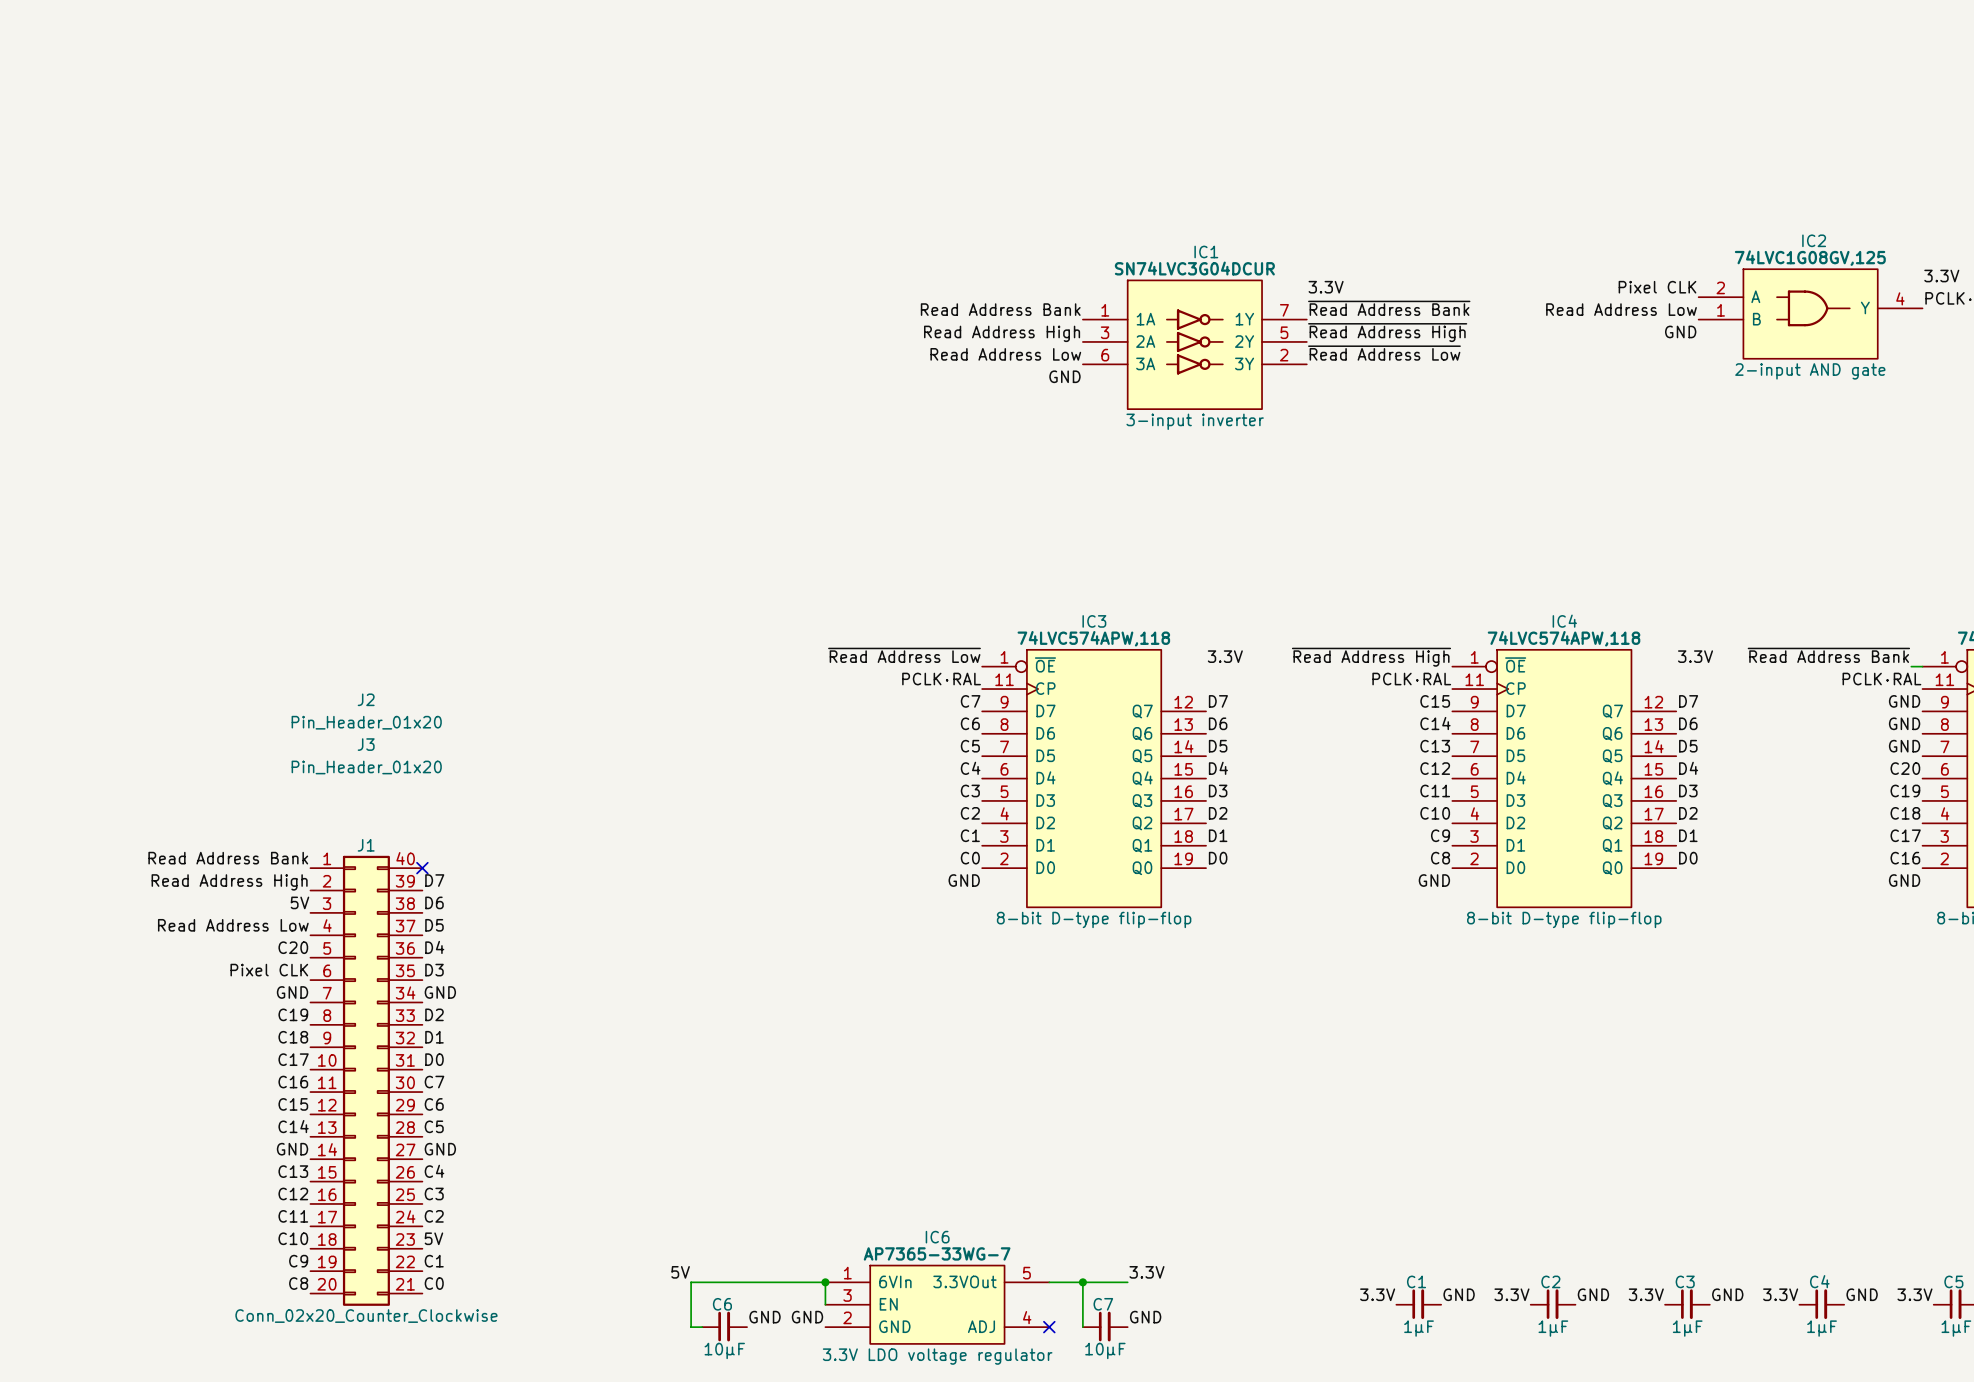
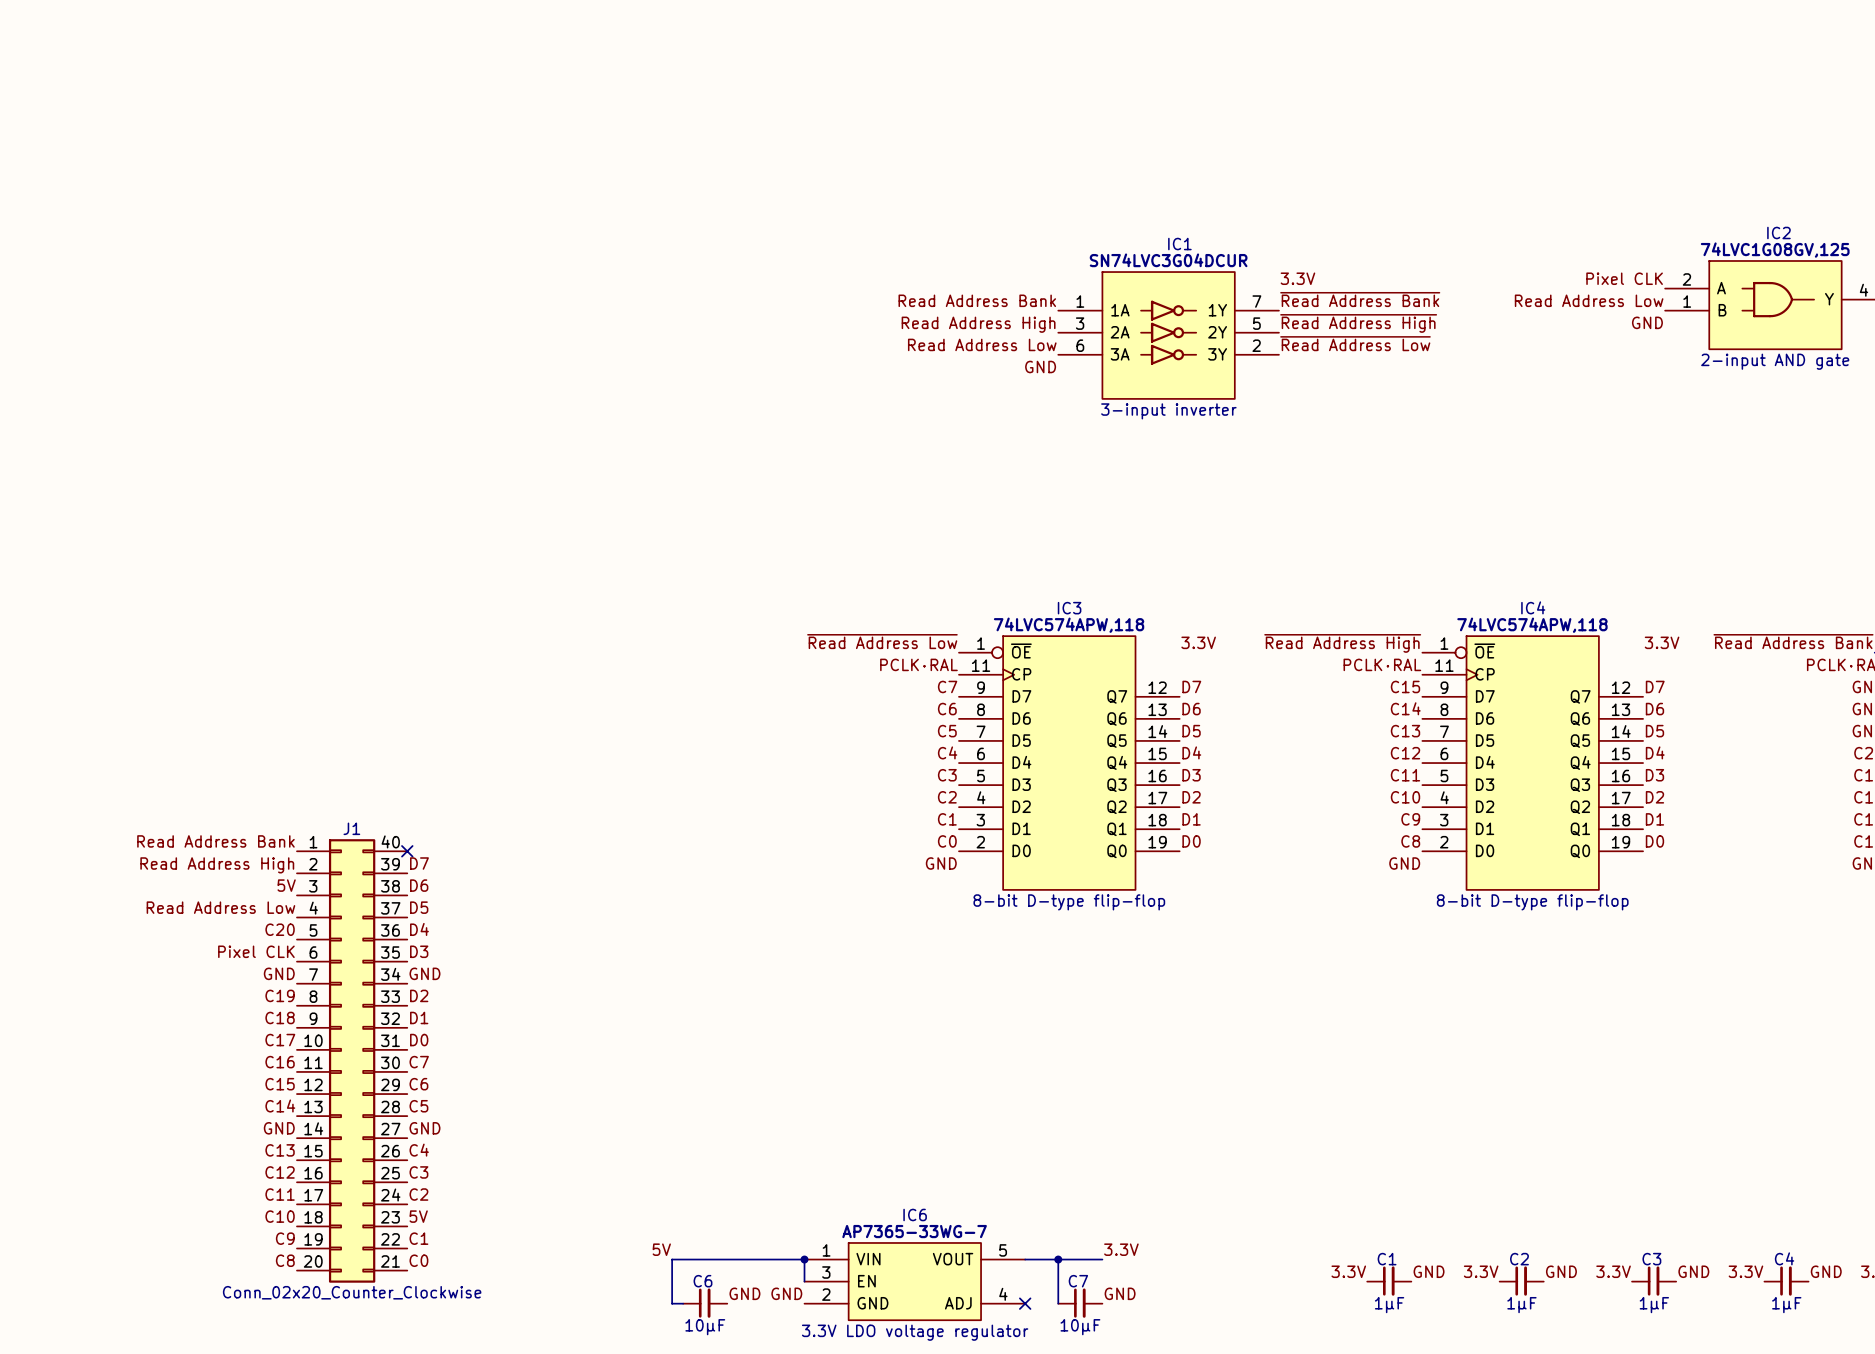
J2: Pin_Header_01x20 (366, 711) -> none
J3: Pin_Header_01x20 (366, 756) -> none
IC6 pin name: 6VIn (895, 1281) -> VIN (868, 1259)
IC6 pin name: 3.3VOut (964, 1281) -> VOUT (953, 1259)

